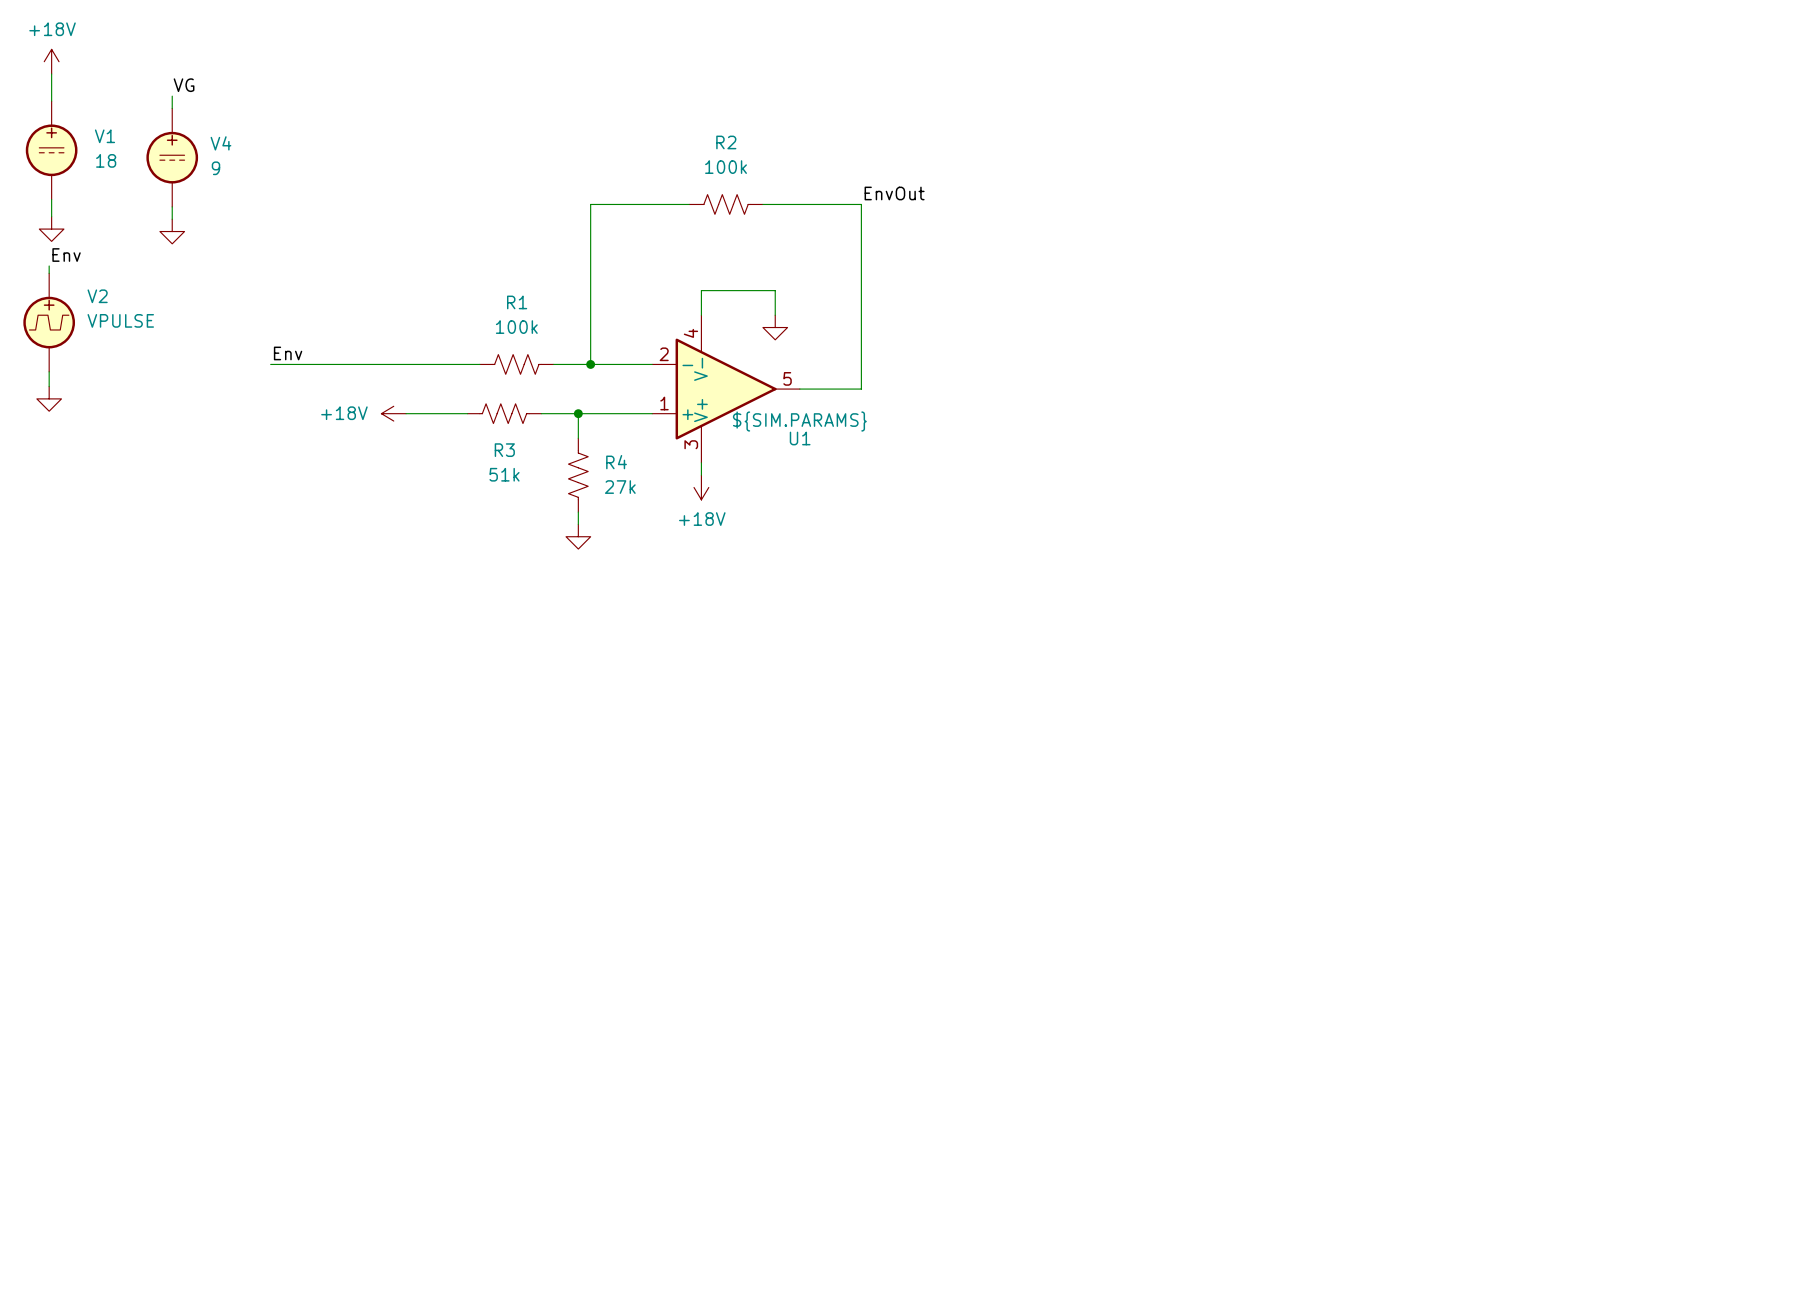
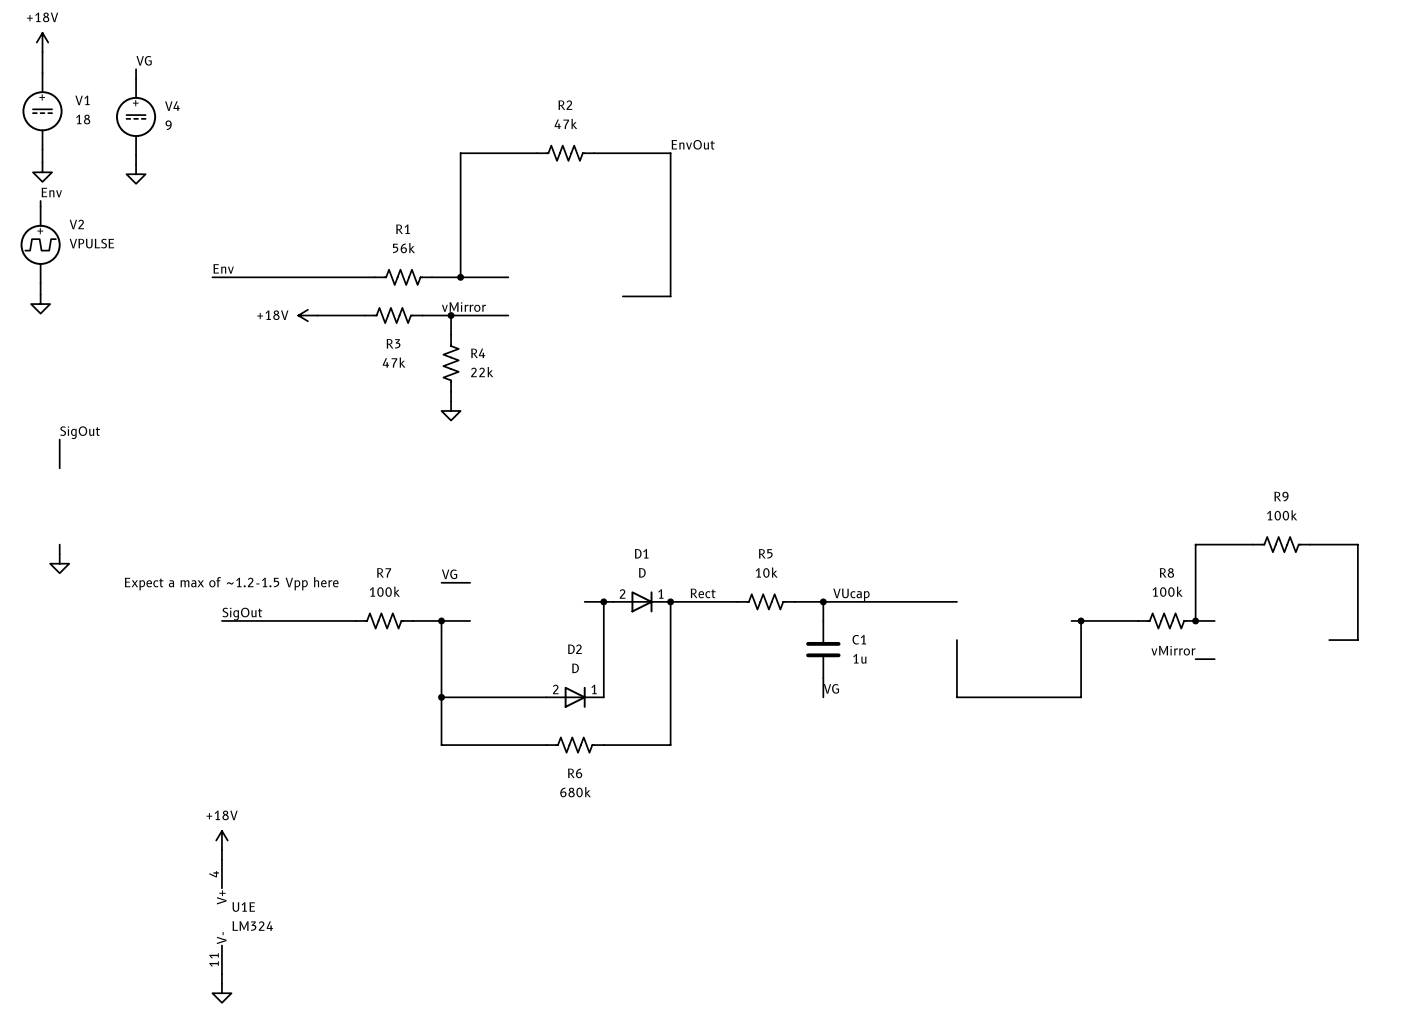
R2 value: 100k (726, 167) -> 47k (565, 123)
wire: (701, 315) (701, 290) (775, 290) (775, 315) -> none
R1 value: 100k (516, 327) -> 56k (403, 248)
power symbol: (775, 327) -> none
U1: ${SIM.PARAMS} (726, 389) -> none
label: none -> vMirror (464, 307)
wire: (701, 462) (701, 475) -> none
R3 value: 51k (504, 474) -> 47k (394, 362)
R4 value: 27k (620, 487) -> 22k (482, 372)
power symbol: +18V (701, 487) -> none
label: none -> SigOut (80, 432)
wire: none -> (59, 439) (59, 468)
wire: none -> (59, 544) (59, 554)
wire: none -> (1252, 544) (1195, 544) (1195, 620) (1214, 620)
R9: none -> 100k (1281, 544)
wire: none -> (1310, 544) (1357, 544) (1357, 640) (1329, 640)
power symbol: none -> (59, 563)
label: none -> VG (449, 574)
wire: none -> (441, 582) (470, 582)
text: none -> Expect a max of ~1.2-1.5 Vpp here (231, 583)
label: none -> Rect (703, 593)
label: none -> VUcap (851, 594)
wire: none -> (584, 601) (613, 601)
wire: none -> (603, 601) (603, 697)
junction: none -> (603, 601)
D1: none -> D (641, 601)
junction: none -> (670, 601)
wire: none -> (737, 601) (670, 601) (670, 745) (603, 745)
R5: none -> 10k (766, 601)
wire: none -> (794, 601) (956, 601)
wire: none -> (823, 601) (823, 620)
junction: none -> (823, 601)
label: none -> SigOut (242, 614)
wire: none -> (221, 620) (355, 620)
R7: none -> 100k (384, 620)
wire: none -> (412, 620) (470, 620)
wire: none -> (441, 620) (441, 745) (546, 745)
junction: none -> (441, 620)
wire: none -> (1071, 620) (1138, 620)
wire: none -> (1081, 620) (1081, 697) (956, 697) (956, 640)
junction: none -> (1081, 620)
R8: none -> 100k (1166, 620)
junction: none -> (1195, 620)
C1: none -> 1u (823, 649)
label: none -> vMirror (1173, 650)
wire: none -> (1195, 659) (1214, 659)
wire: none -> (823, 678) (823, 697)
label: none -> VG (831, 688)
wire: none -> (441, 697) (546, 697)
junction: none -> (441, 697)
D2: none -> D (575, 697)
R6: none -> 680k (575, 745)
power symbol: none -> +18V (221, 840)
wire: none -> (221, 850) (221, 859)
U1E: none -> LM324 (221, 916)
wire: none -> (221, 974) (221, 983)
power symbol: none -> (221, 993)

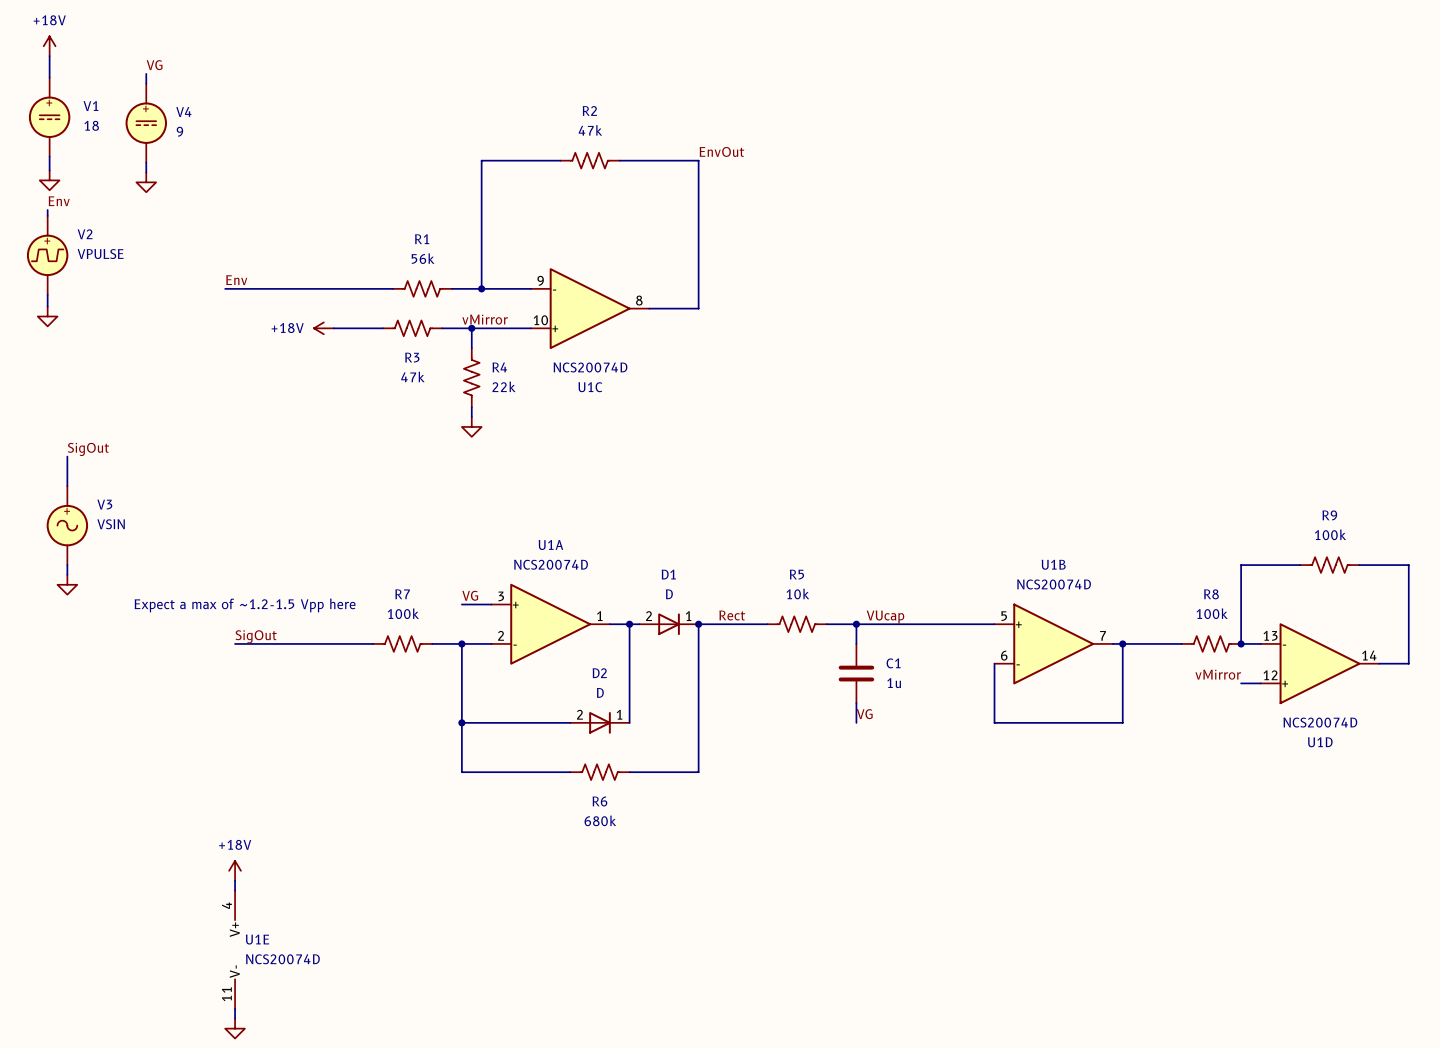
U1C: none -> NCS20074D (590, 308)
V3: none -> VSIN (67, 525)
U1A: none -> NCS20074D (550, 624)
U1B: none -> NCS20074D (1053, 643)
U1D: none -> NCS20074D (1320, 663)
U1E value: LM324 (252, 926) -> NCS20074D (282, 959)

